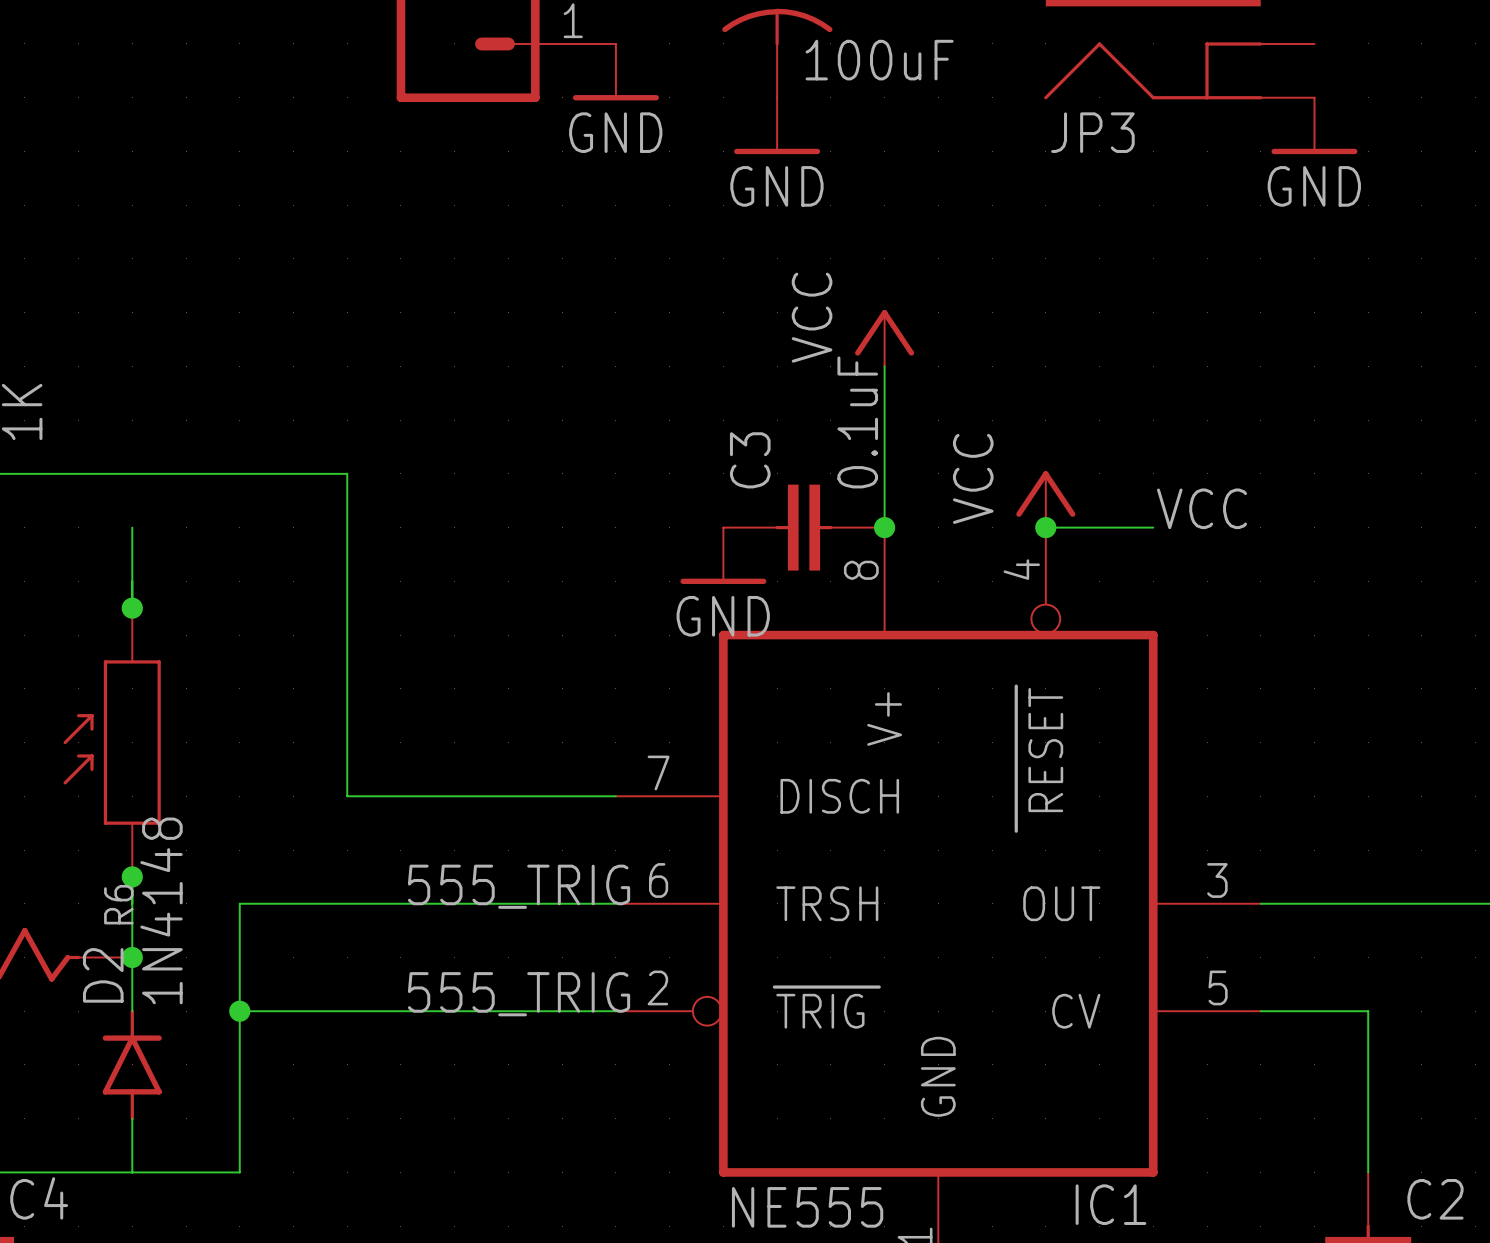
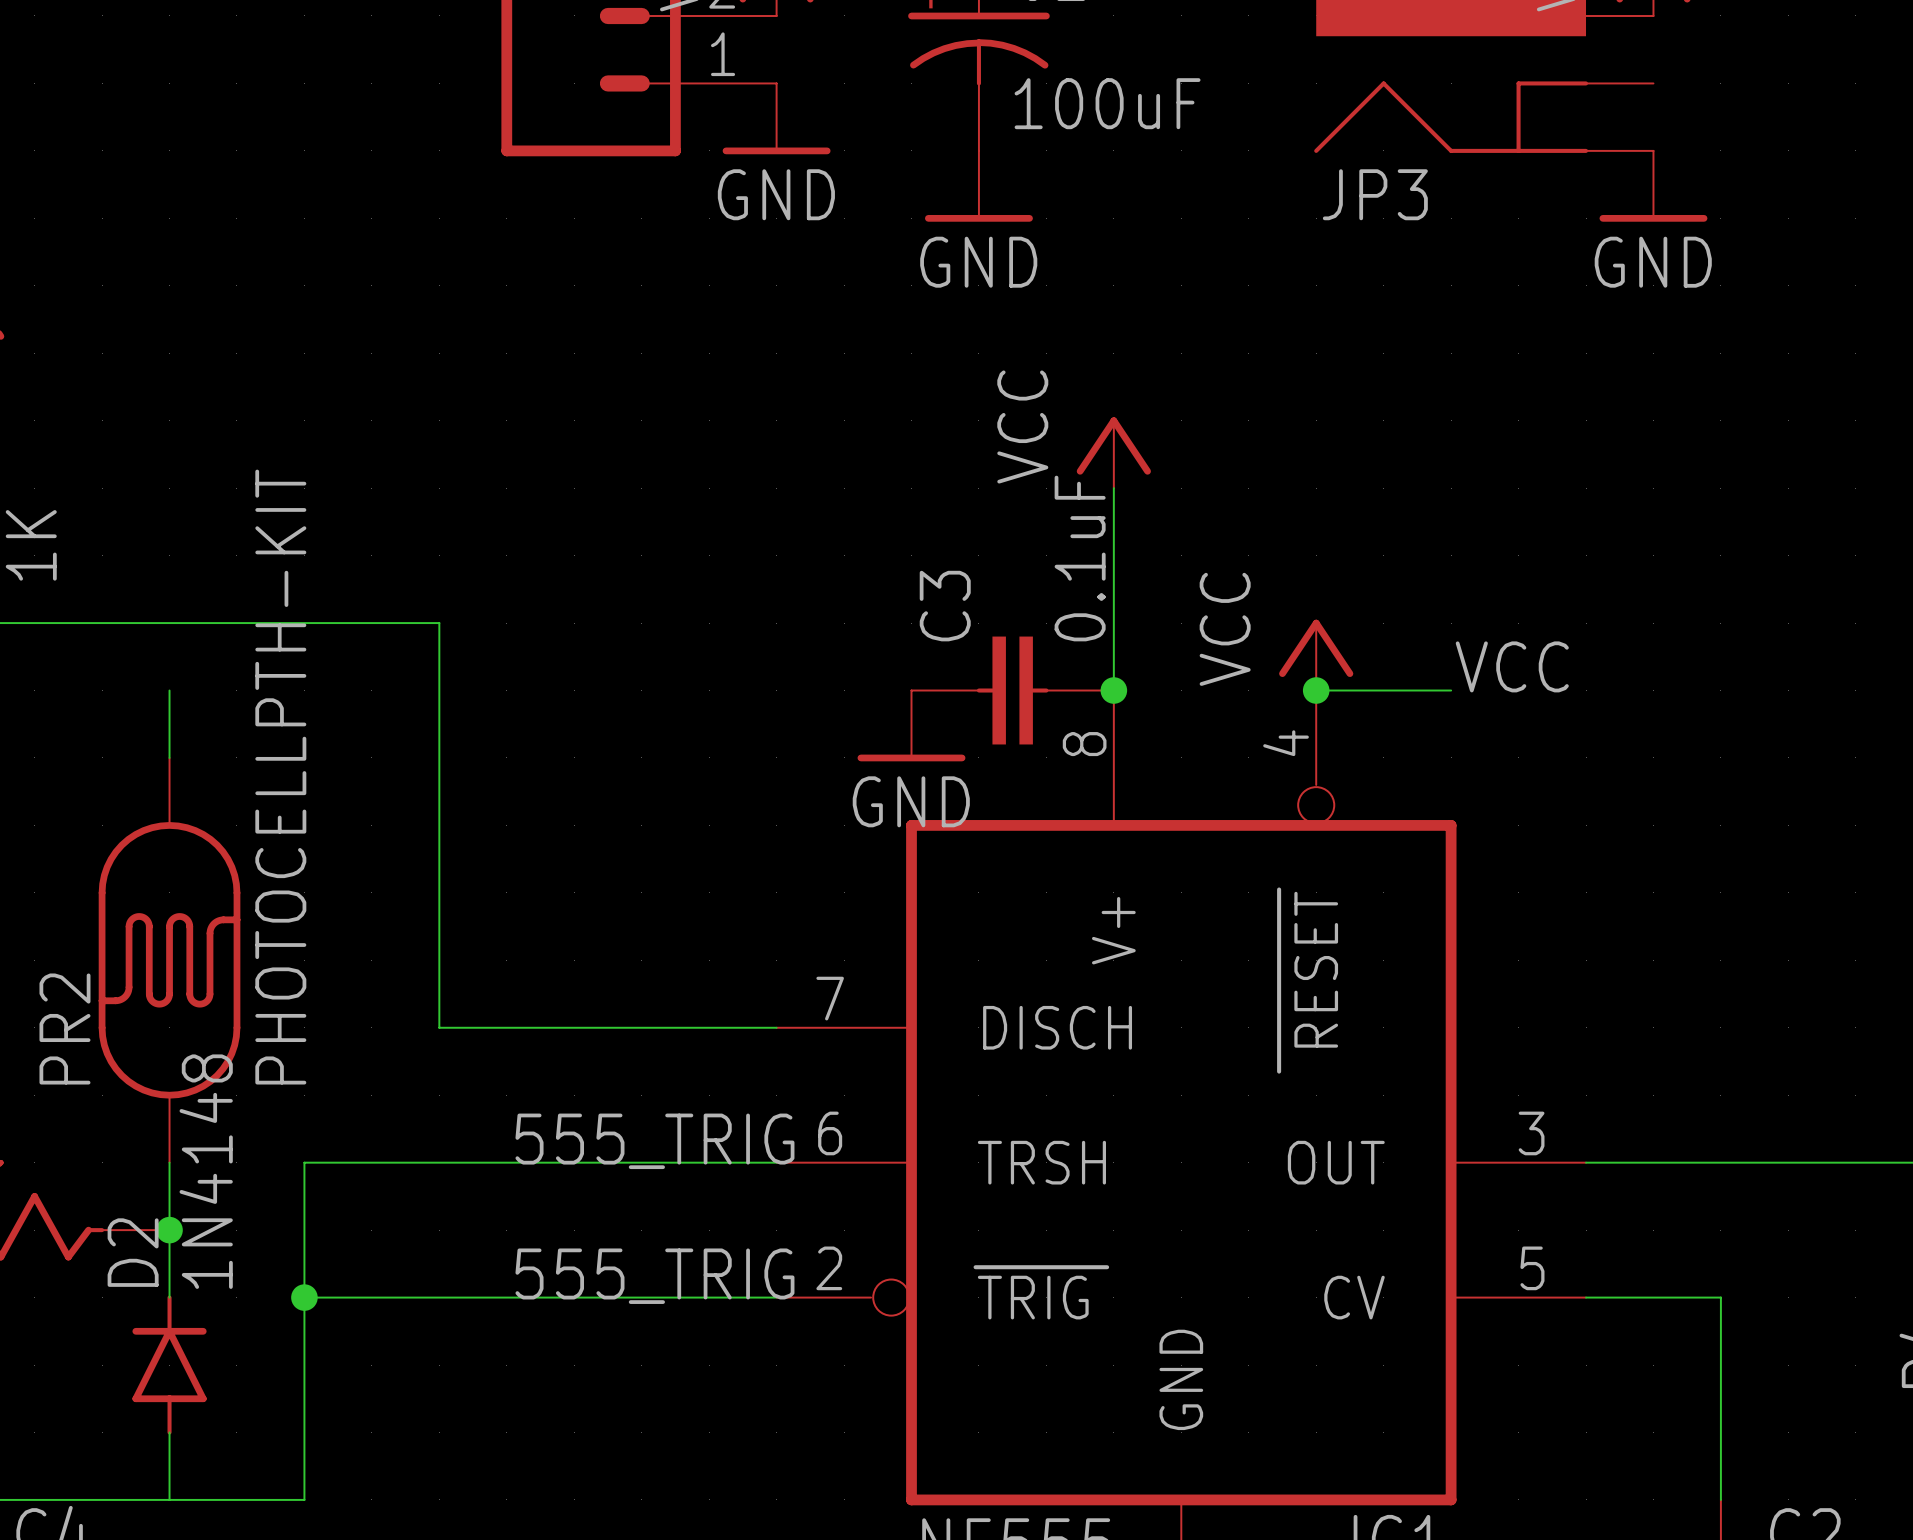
junction: (132, 608) -> none
R6: (112, 742) -> none
PR2: none -> PHOTOCELLPTH-KIT (169, 960)
junction: (132, 876) -> none

